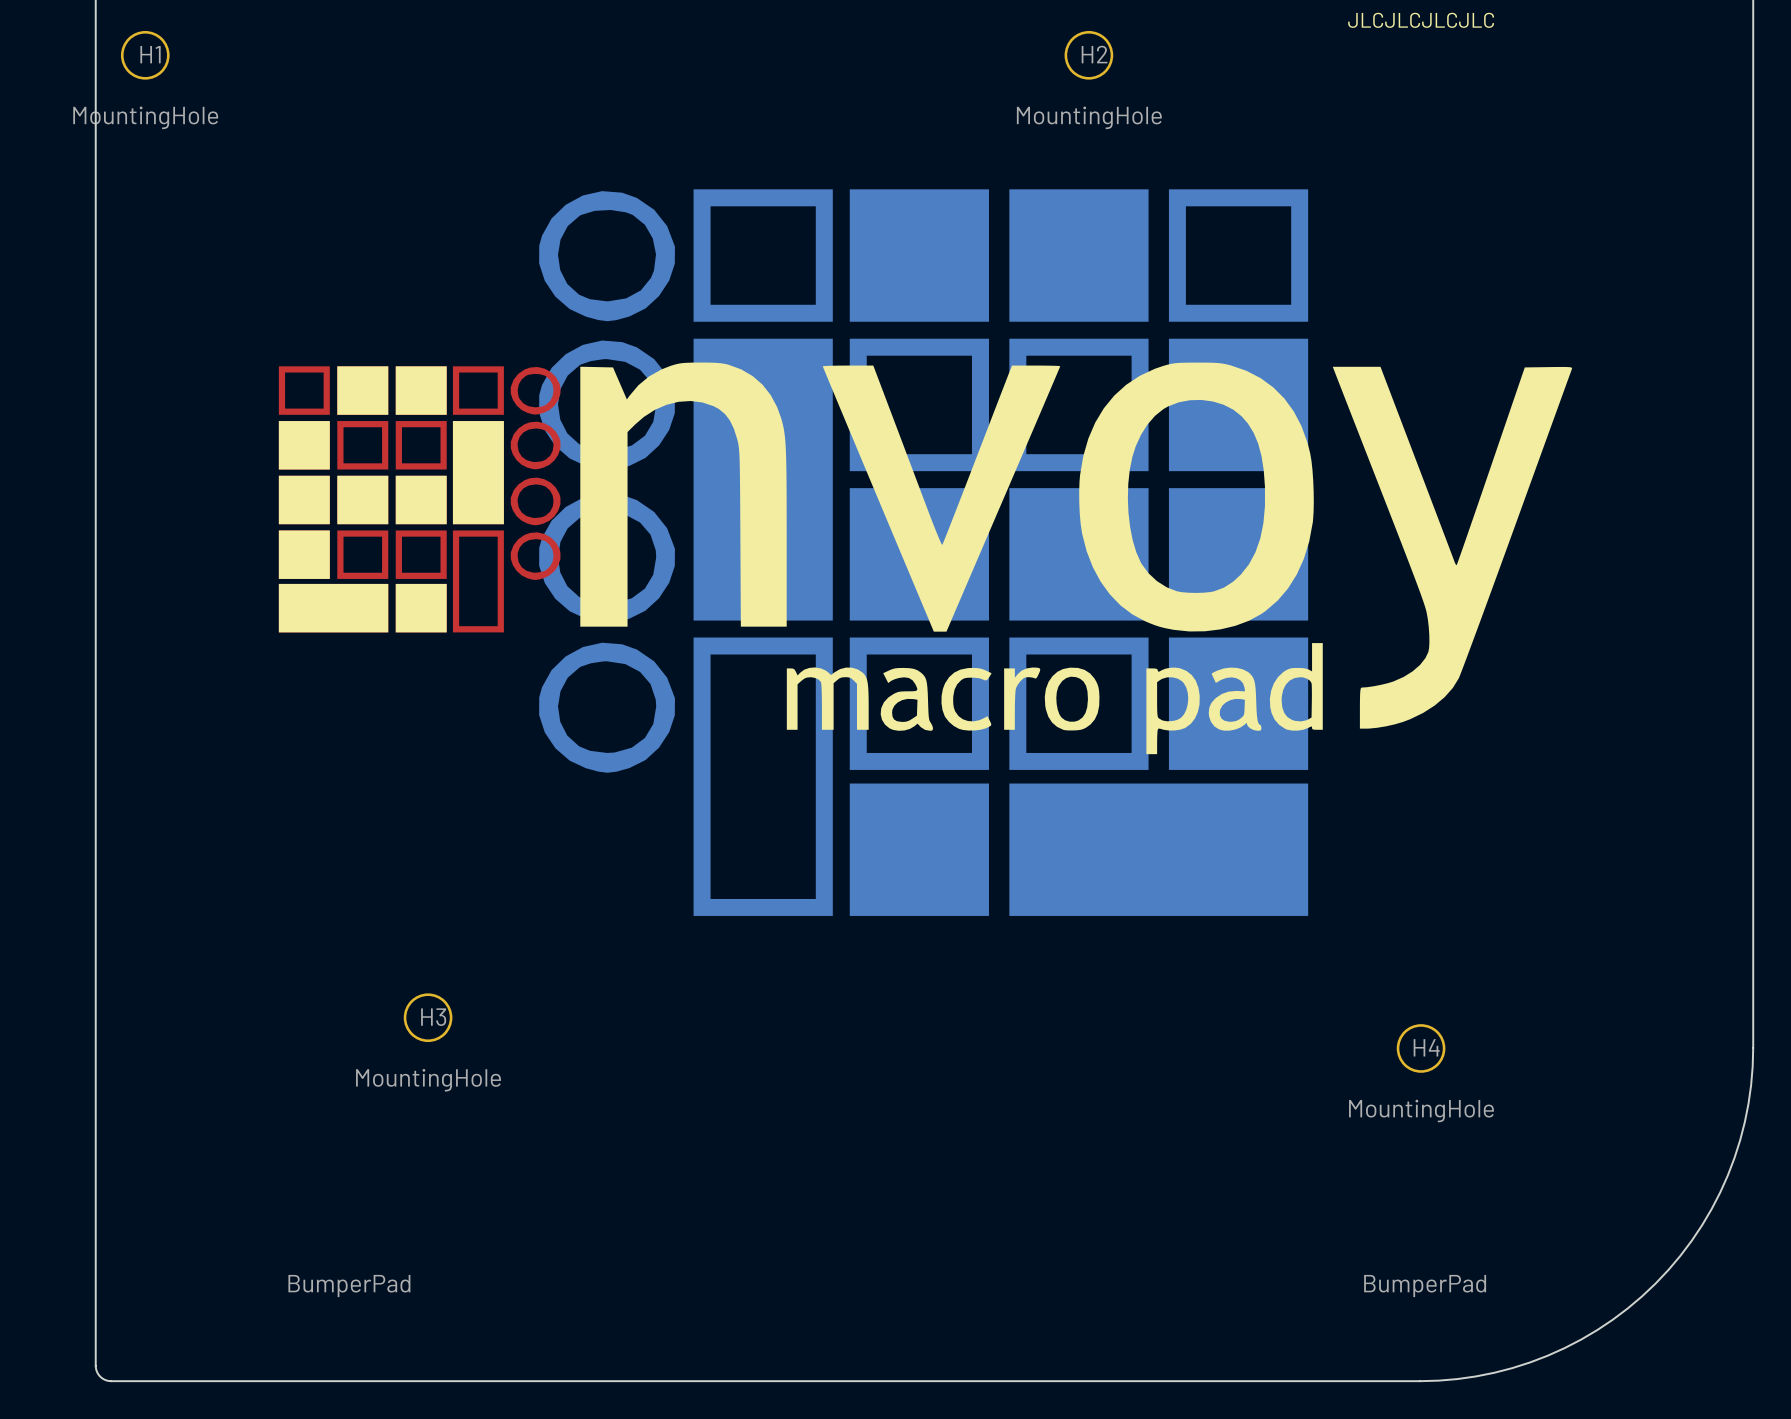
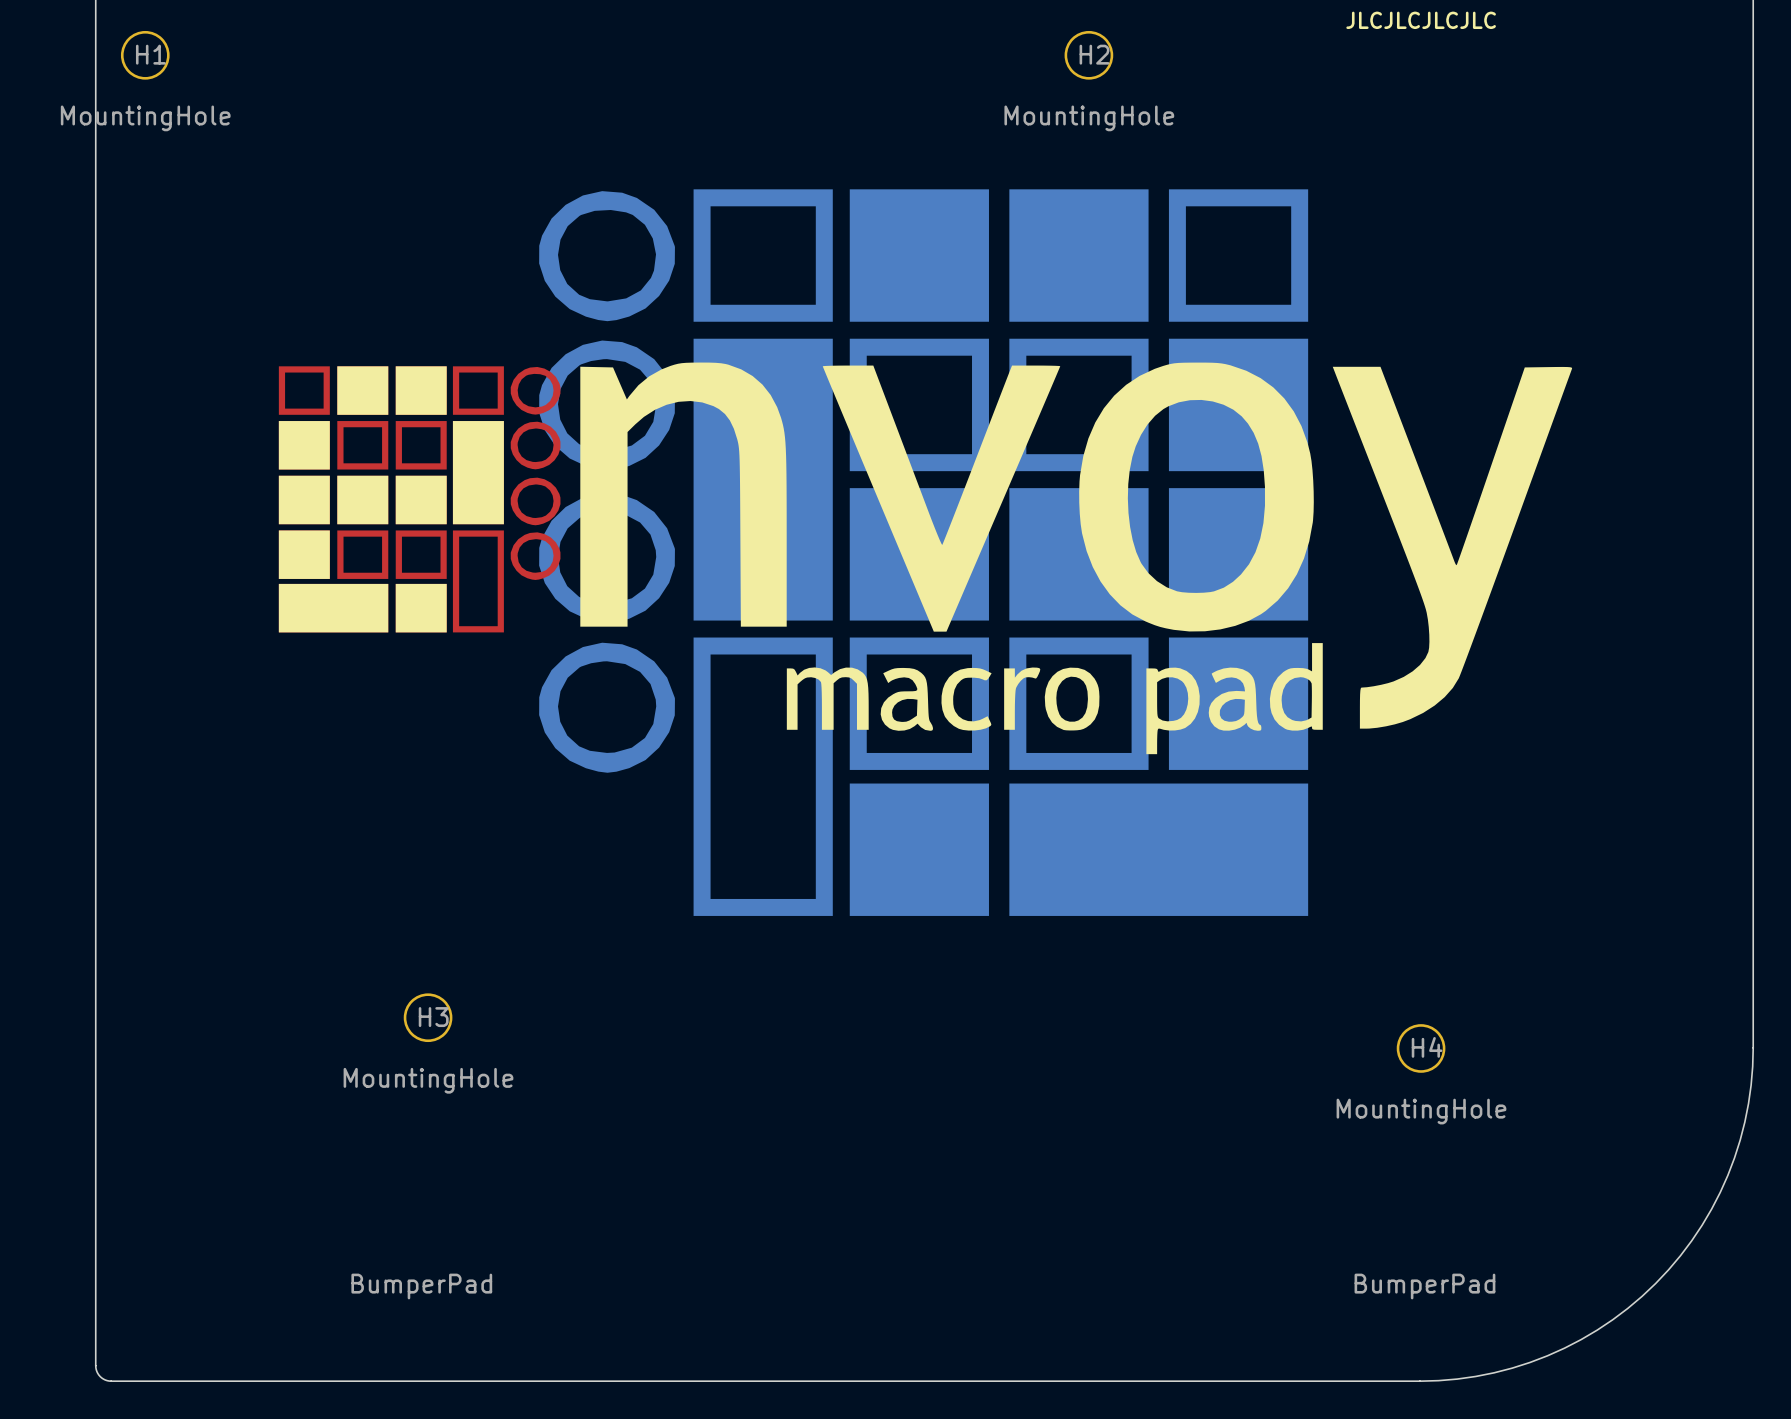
drawing position: (349, 1286) -> (421, 1286)

